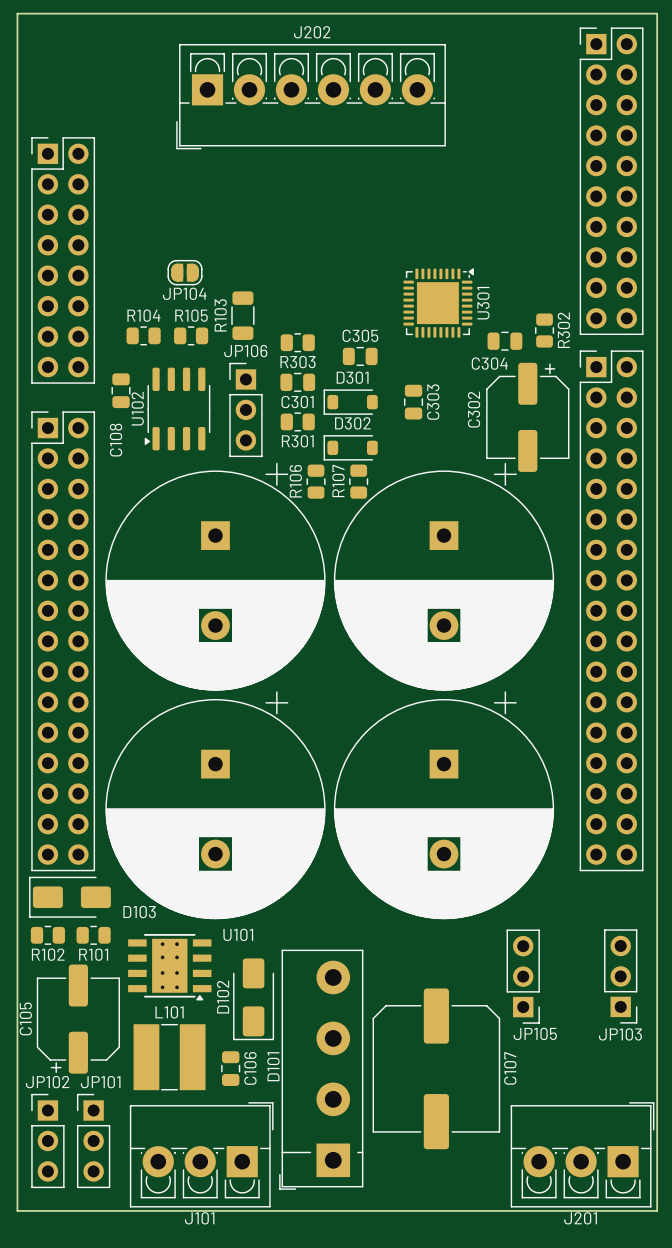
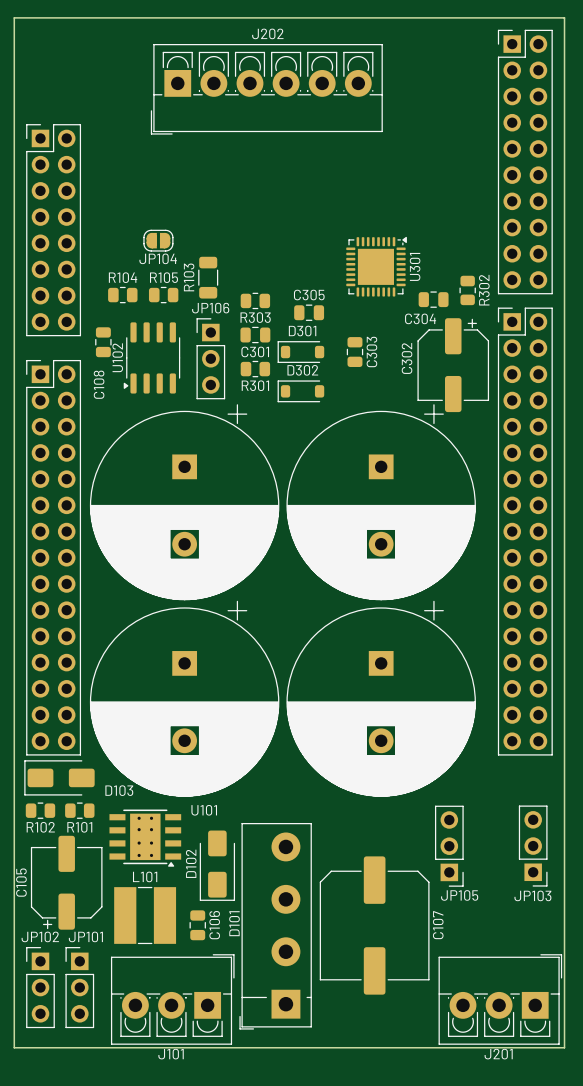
R106: (316, 481) -> none
R107: (358, 481) -> none

